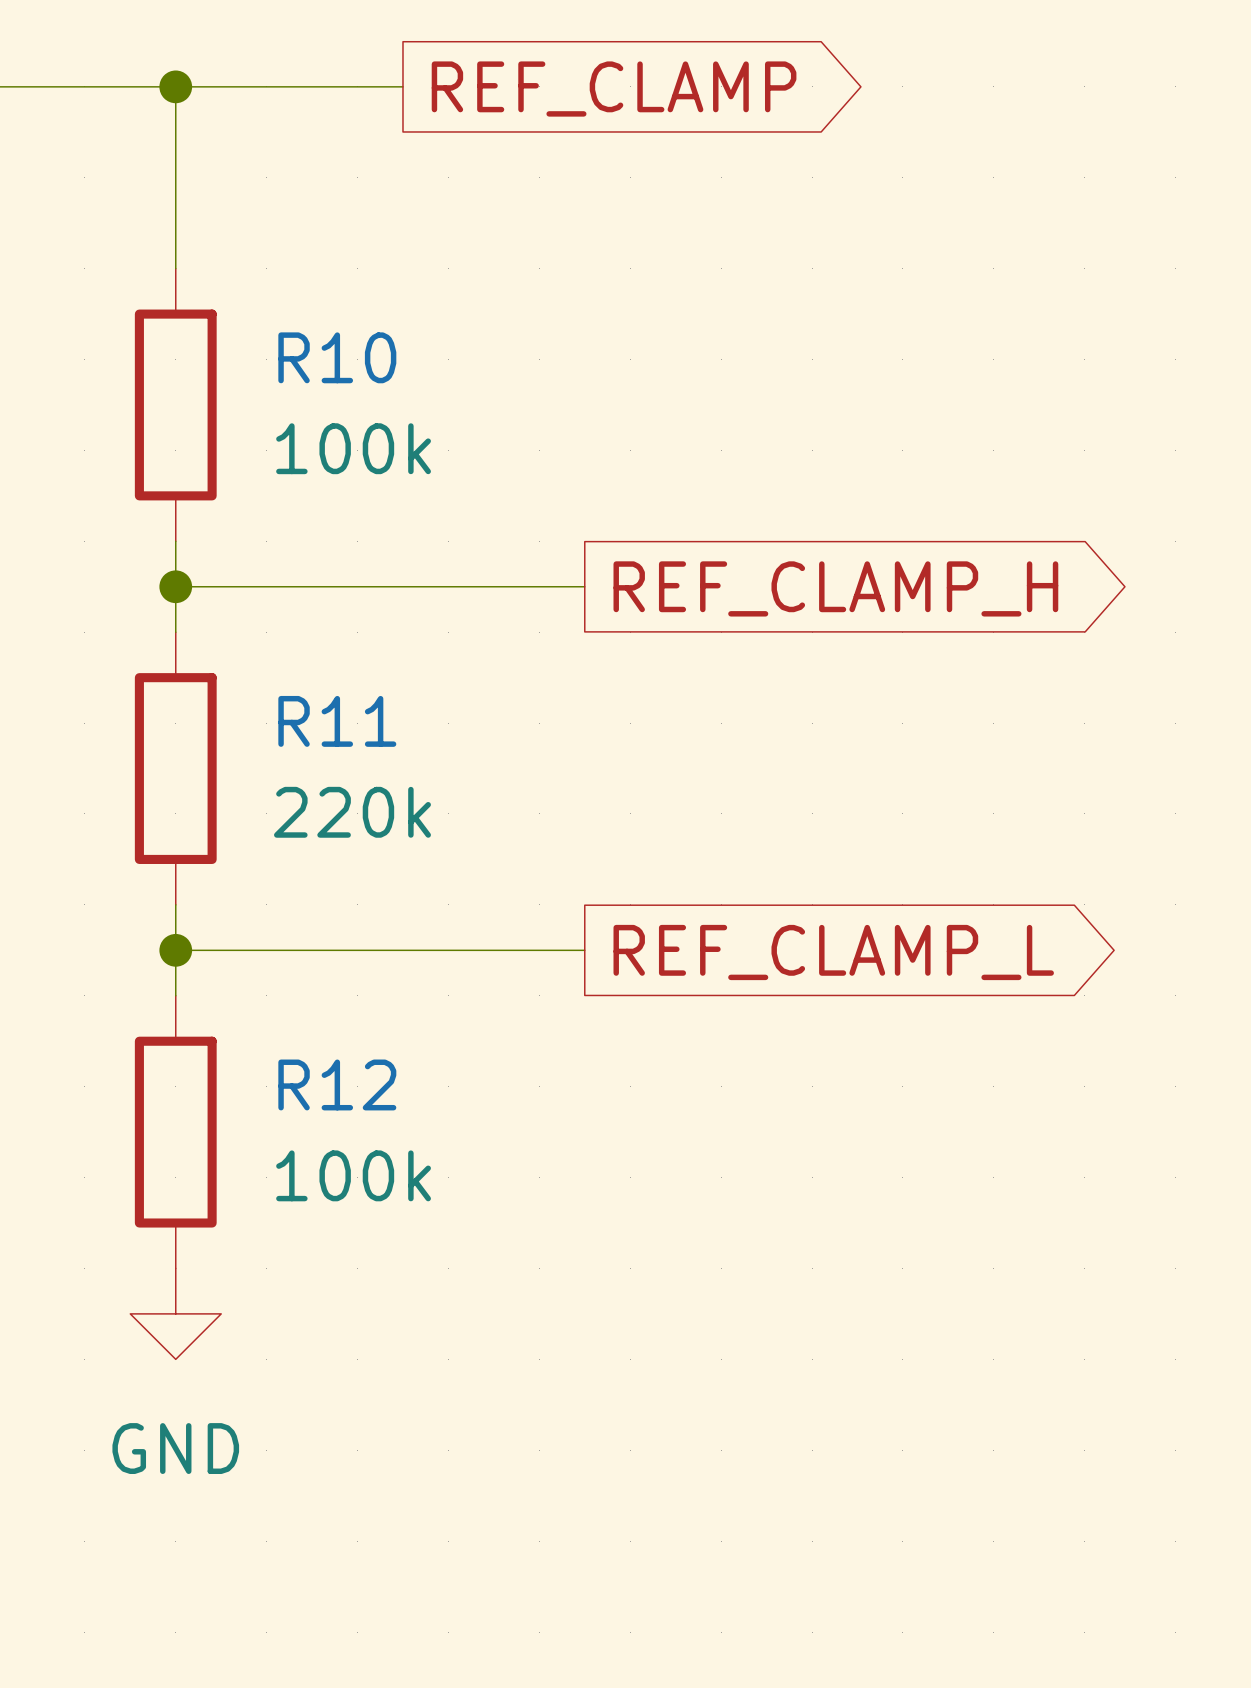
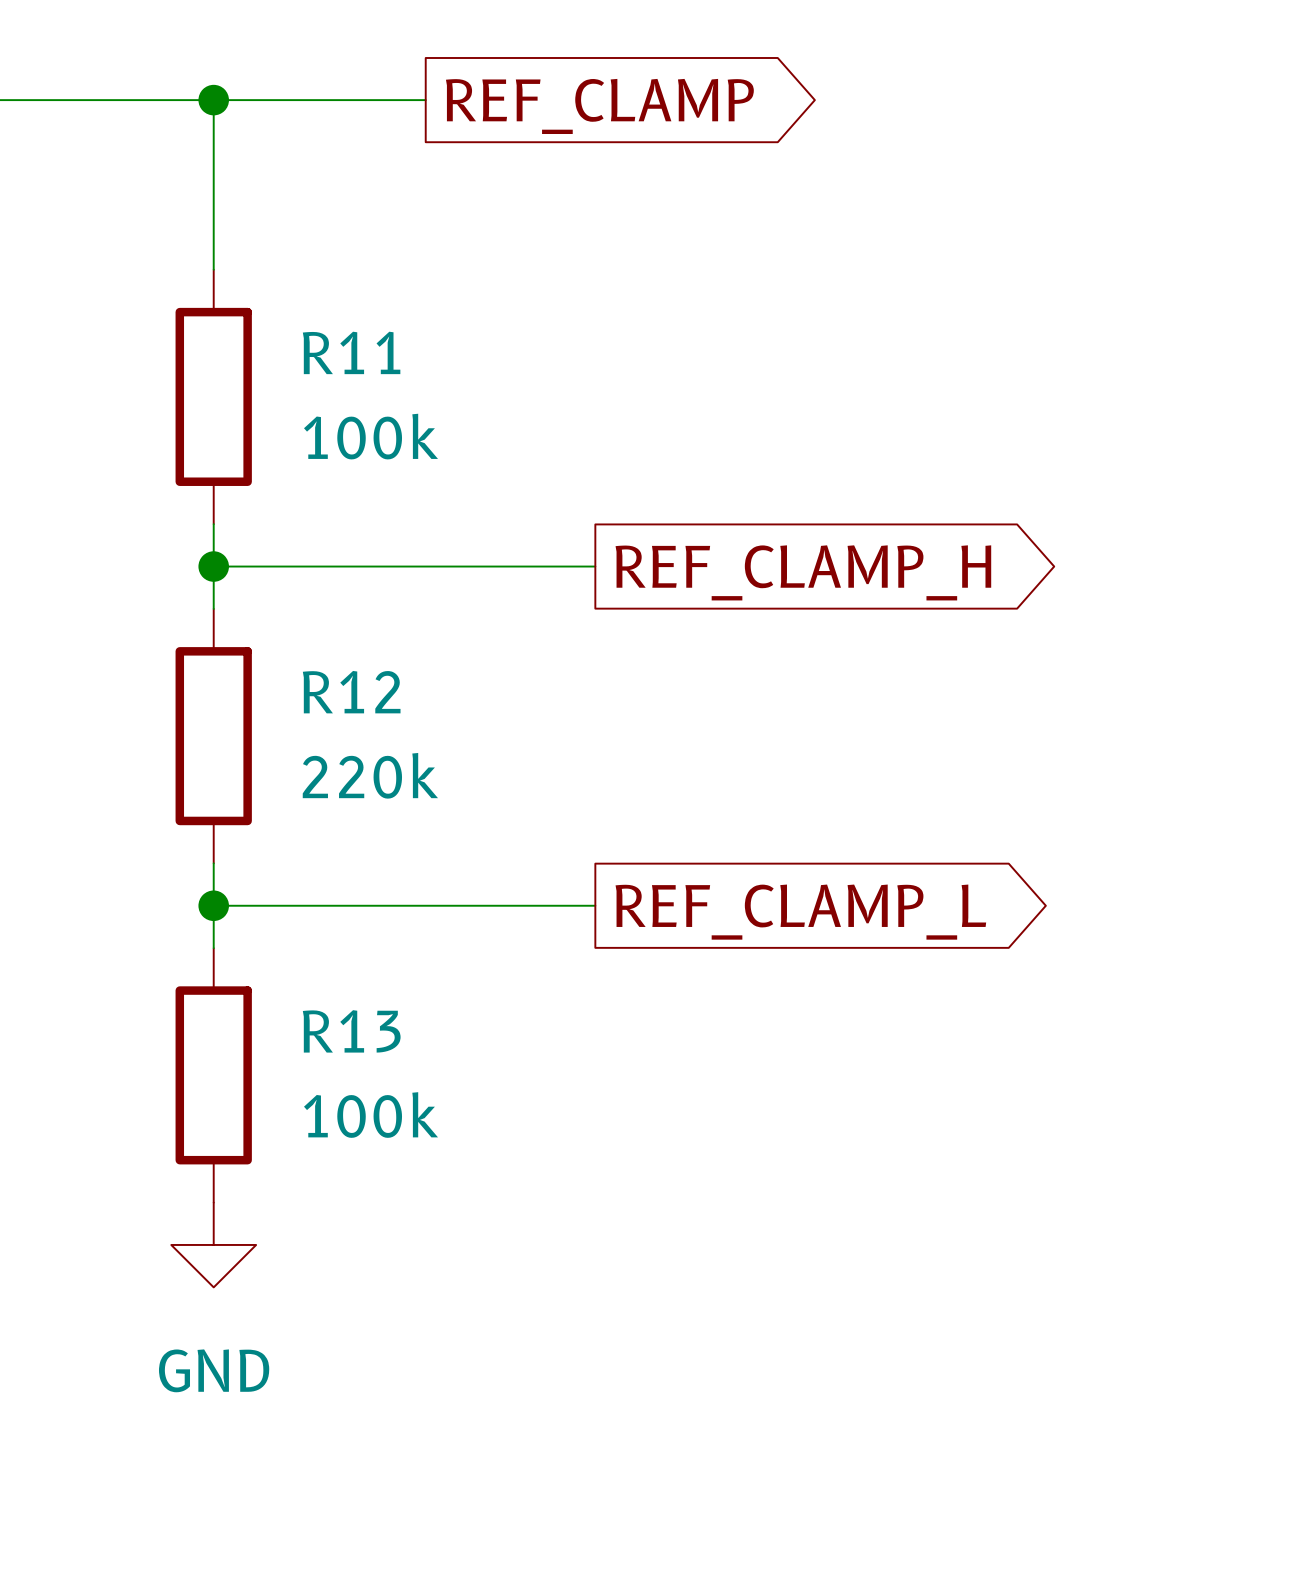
R10 name: R10 (337, 357) -> R11 (351, 352)
R11 name: R11 (337, 721) -> R12 (351, 692)
R12 name: R12 (337, 1084) -> R13 (351, 1031)

